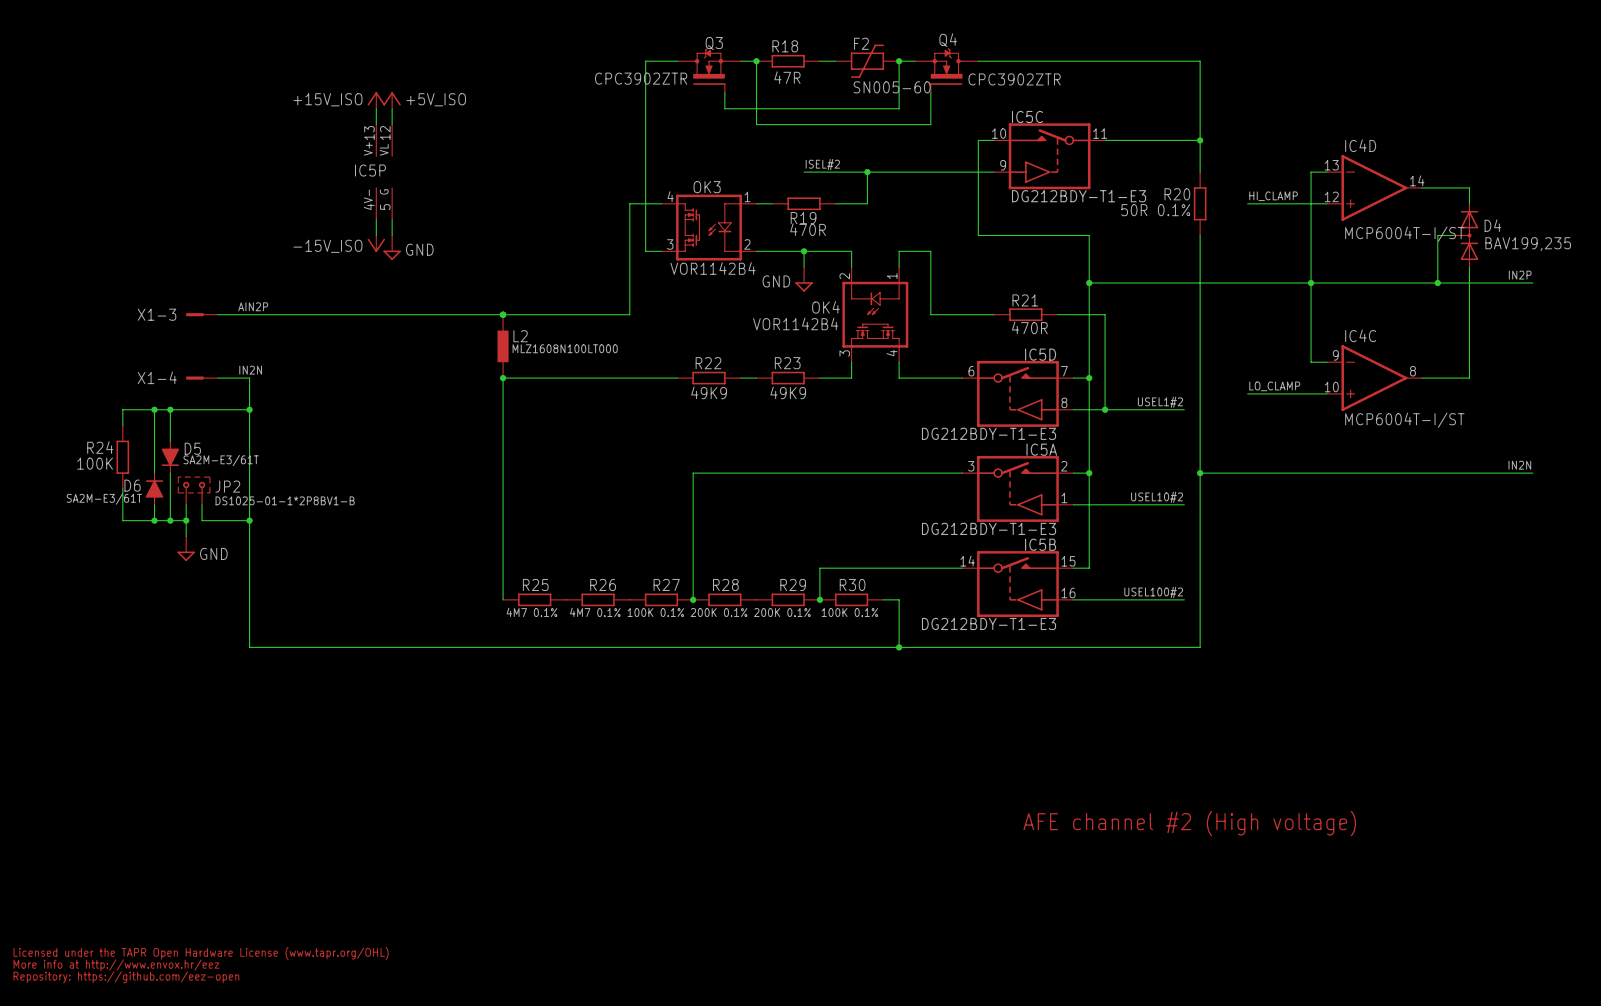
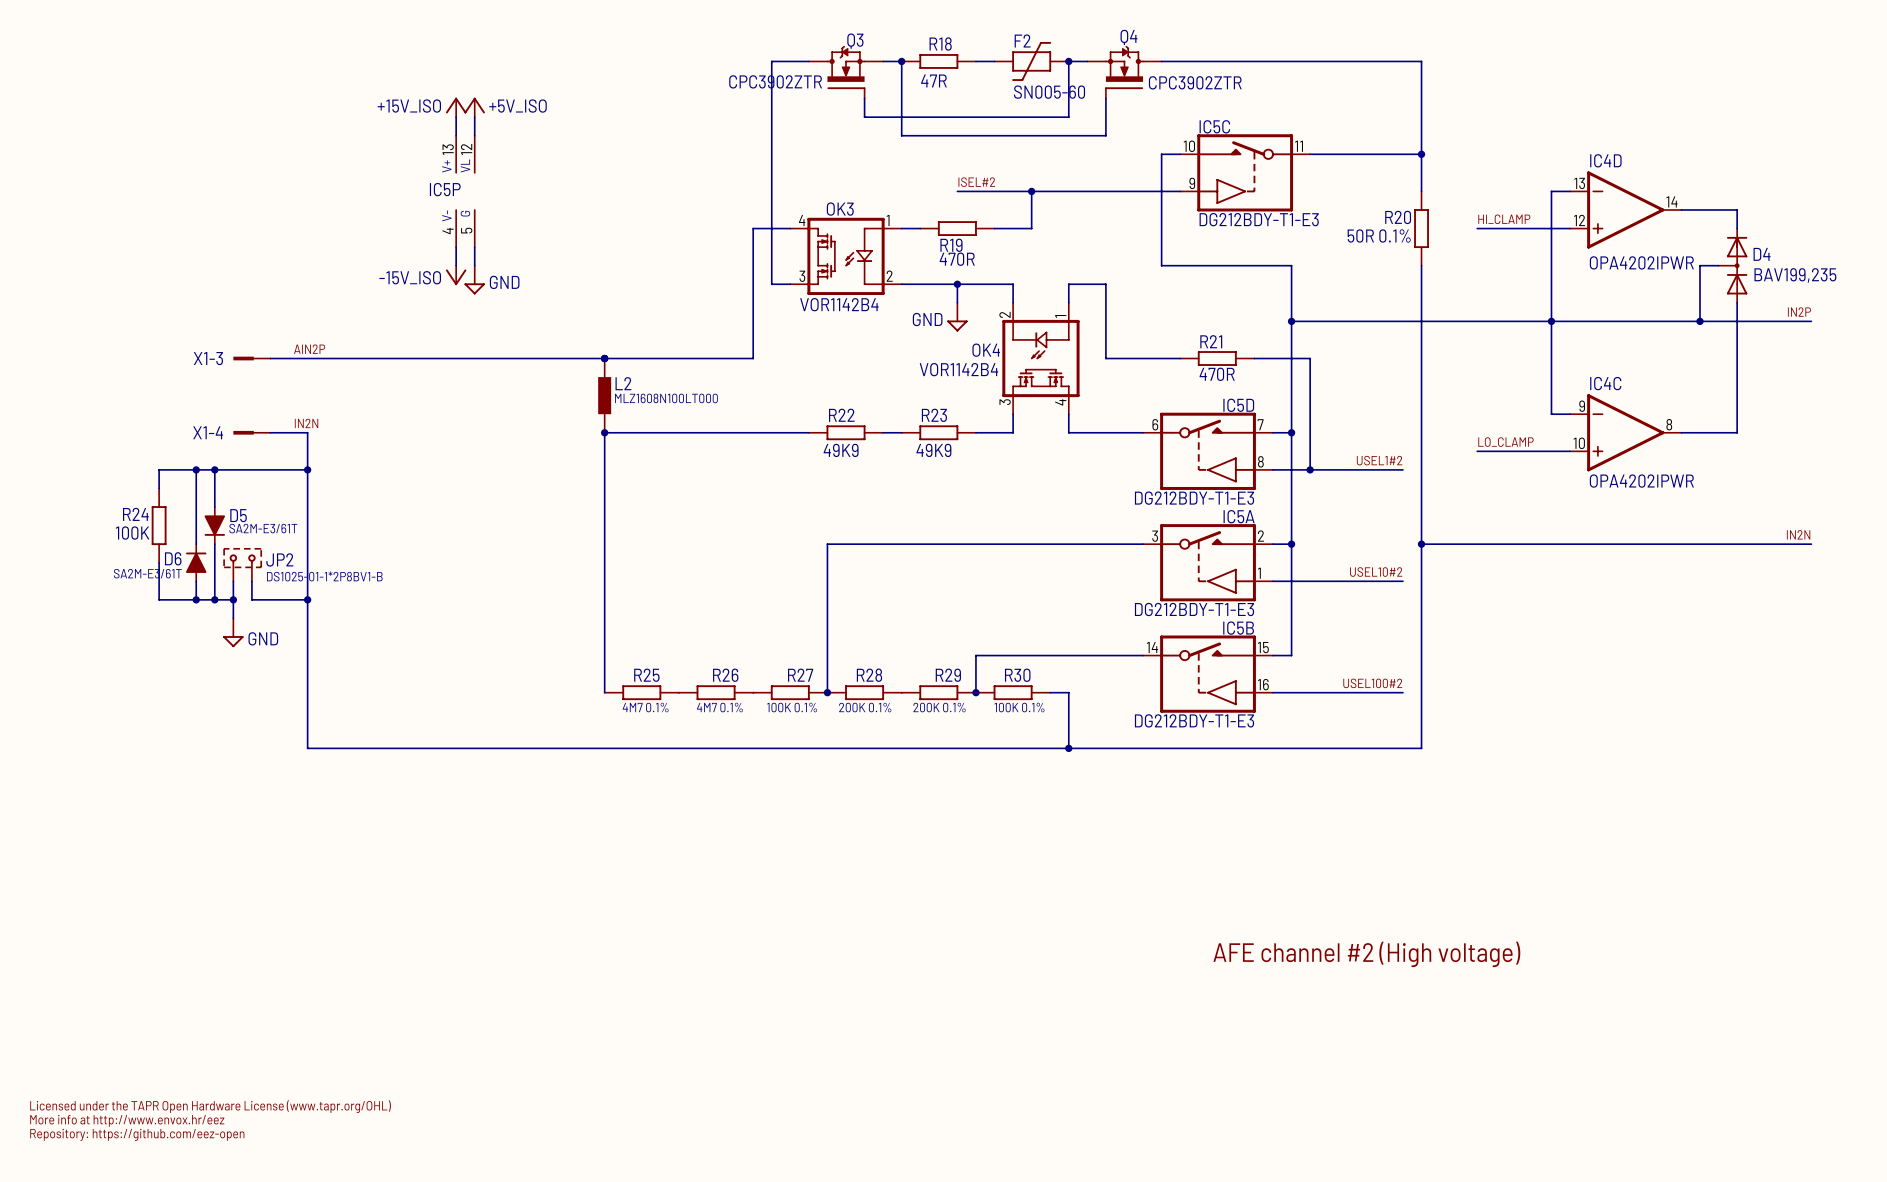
IC4D value: MCP6004T-I/ST (1404, 234) -> OPA4202IPWR (1641, 262)
IC4C value: MCP6004T-I/ST (1404, 420) -> OPA4202IPWR (1641, 481)

